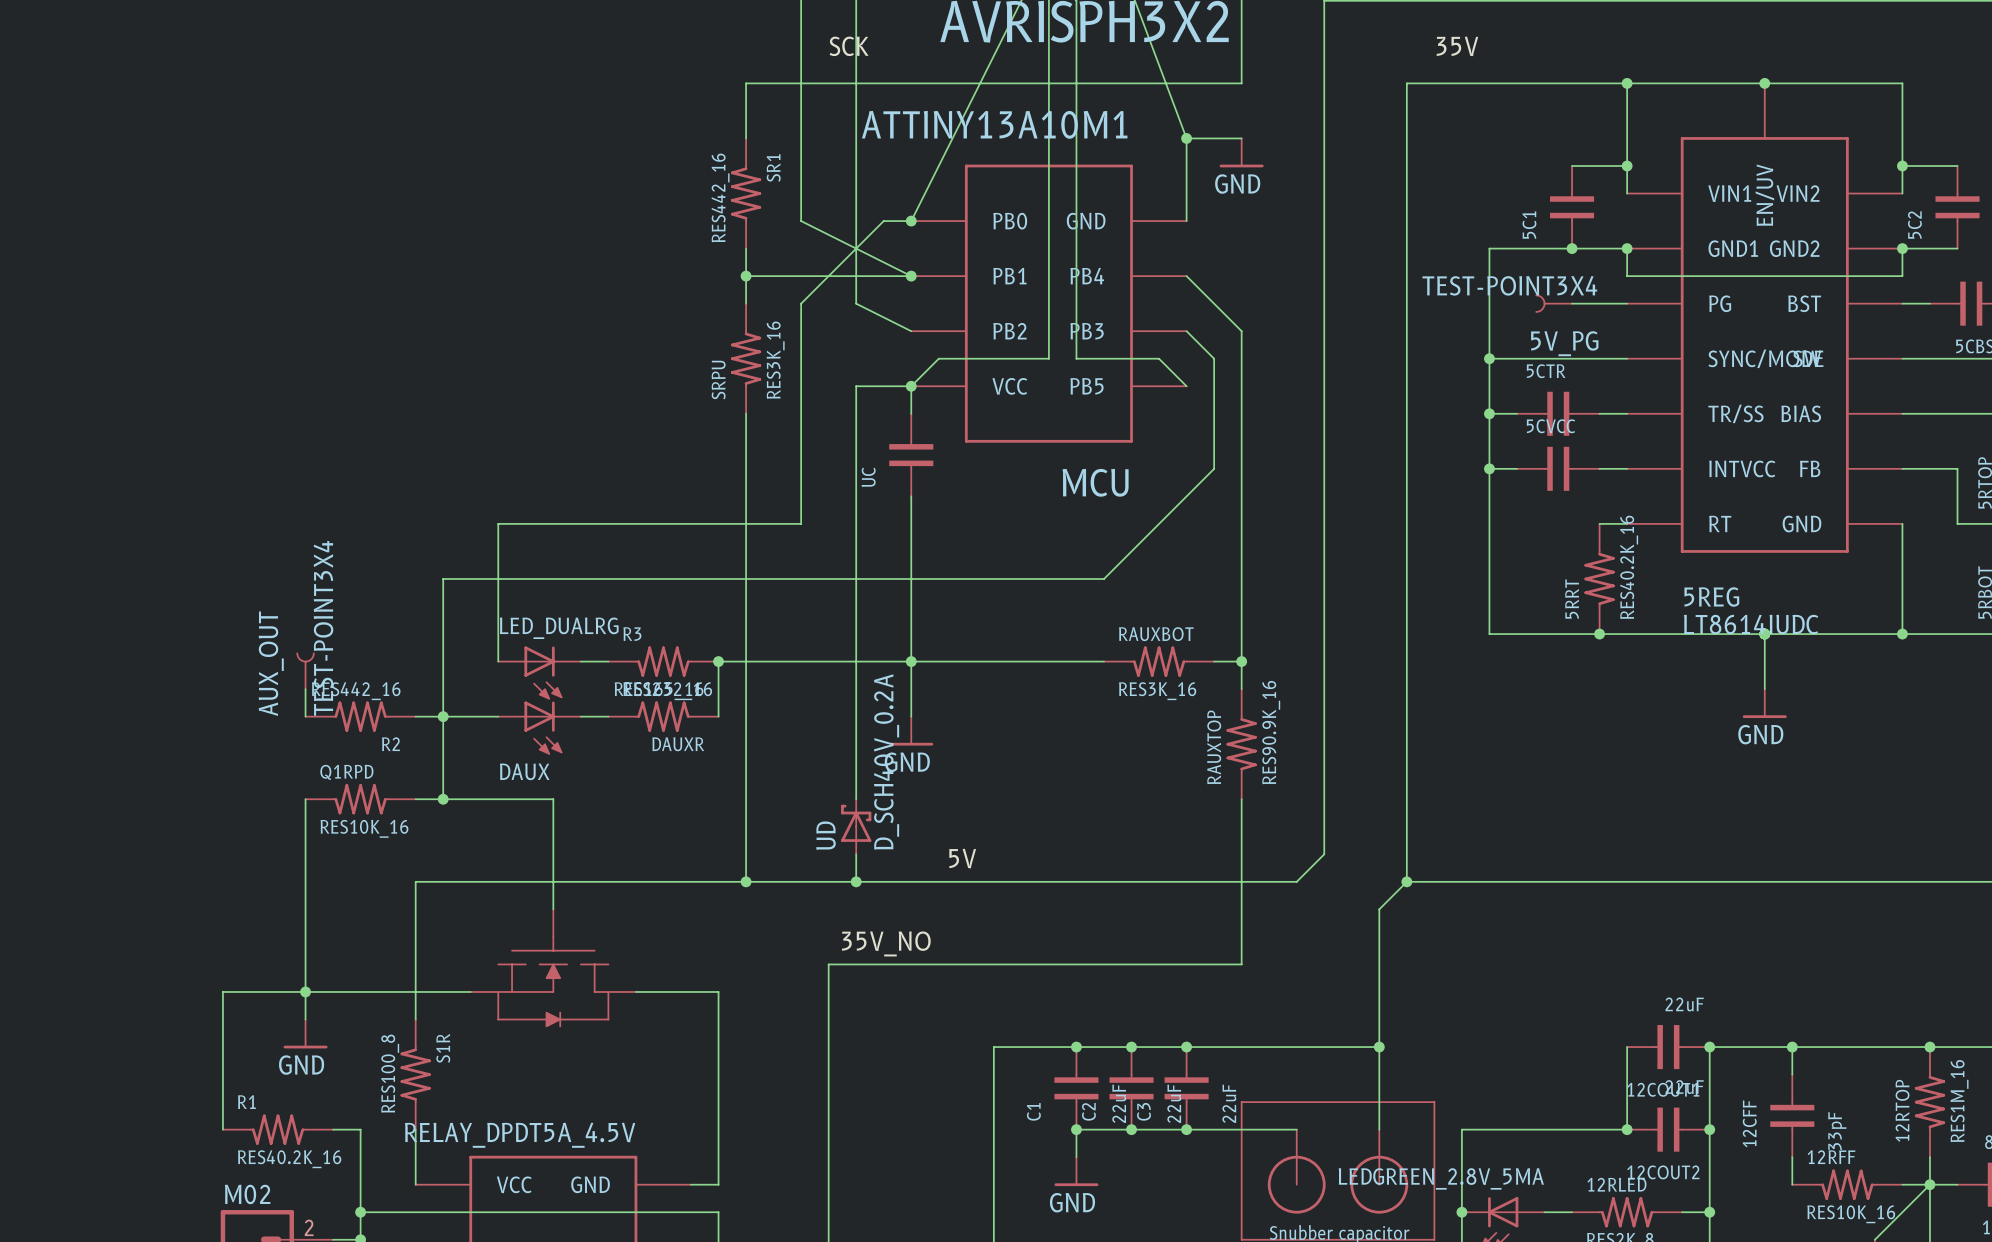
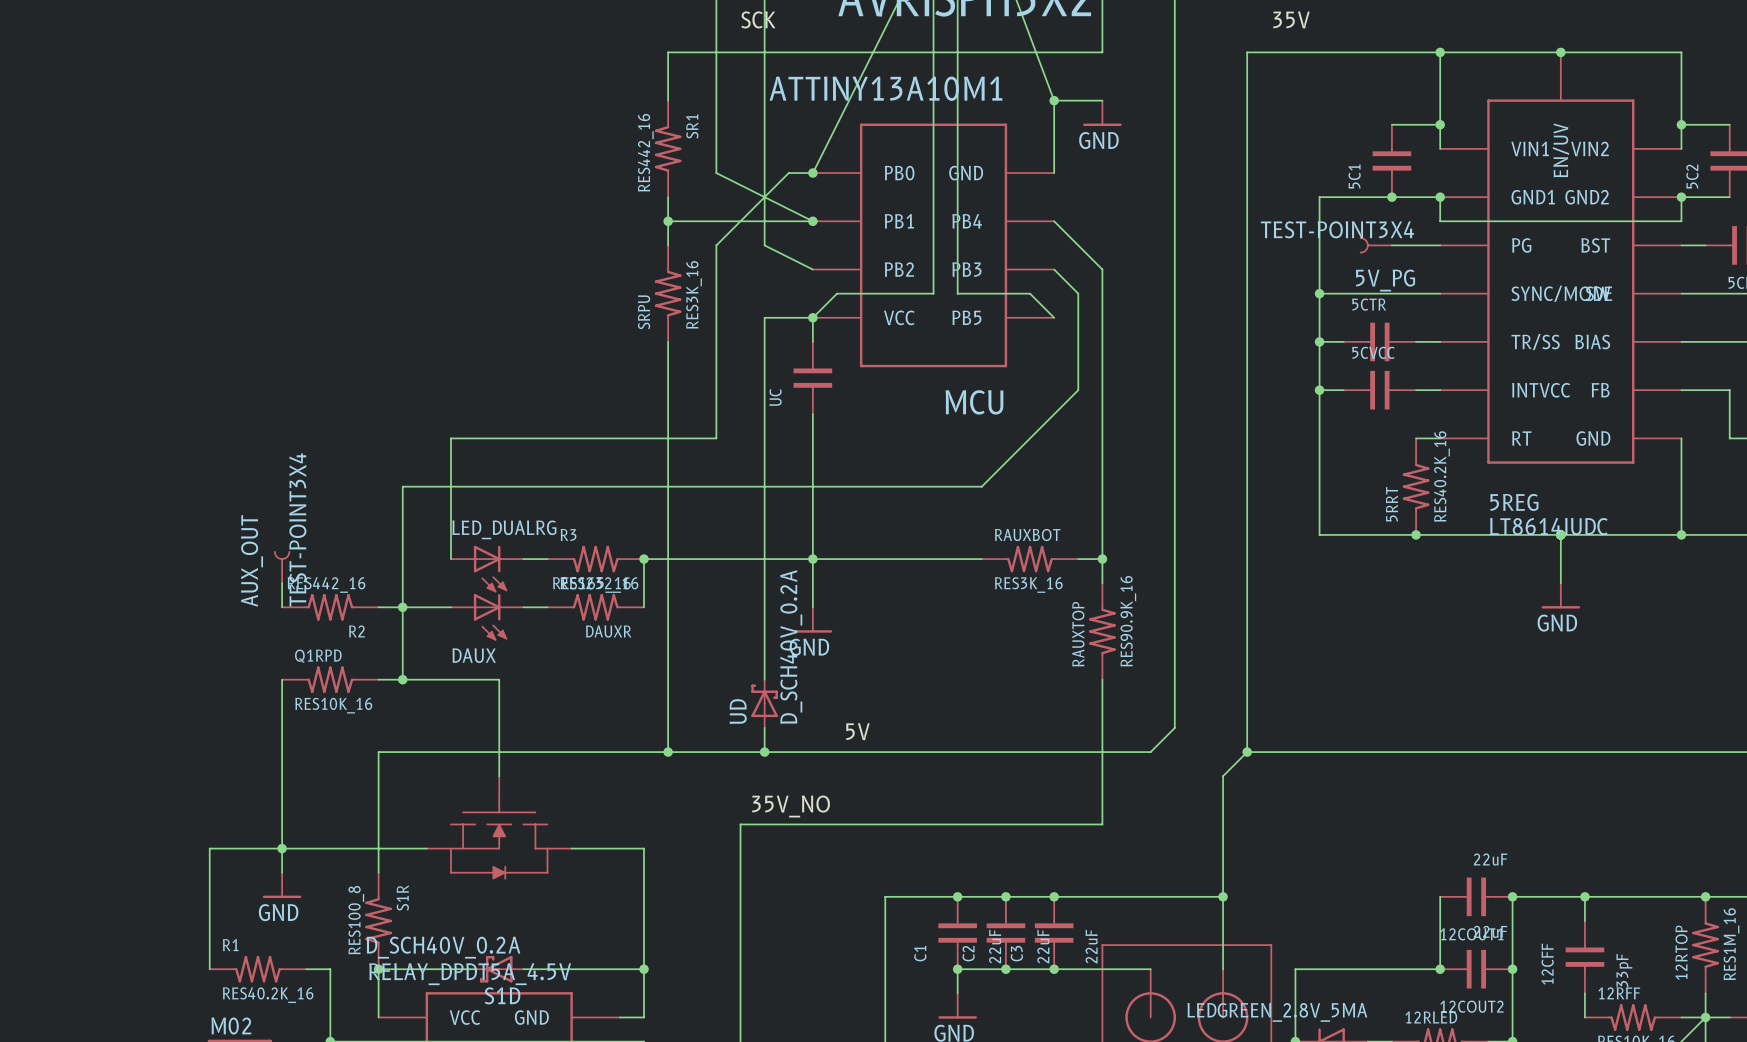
wire: none -> (378, 969) (475, 969)
junction: none -> (378, 969)
S1D: none -> D_SCH40V_0.2A (499, 969)
wire: none -> (523, 969) (644, 969)
junction: none -> (644, 969)

